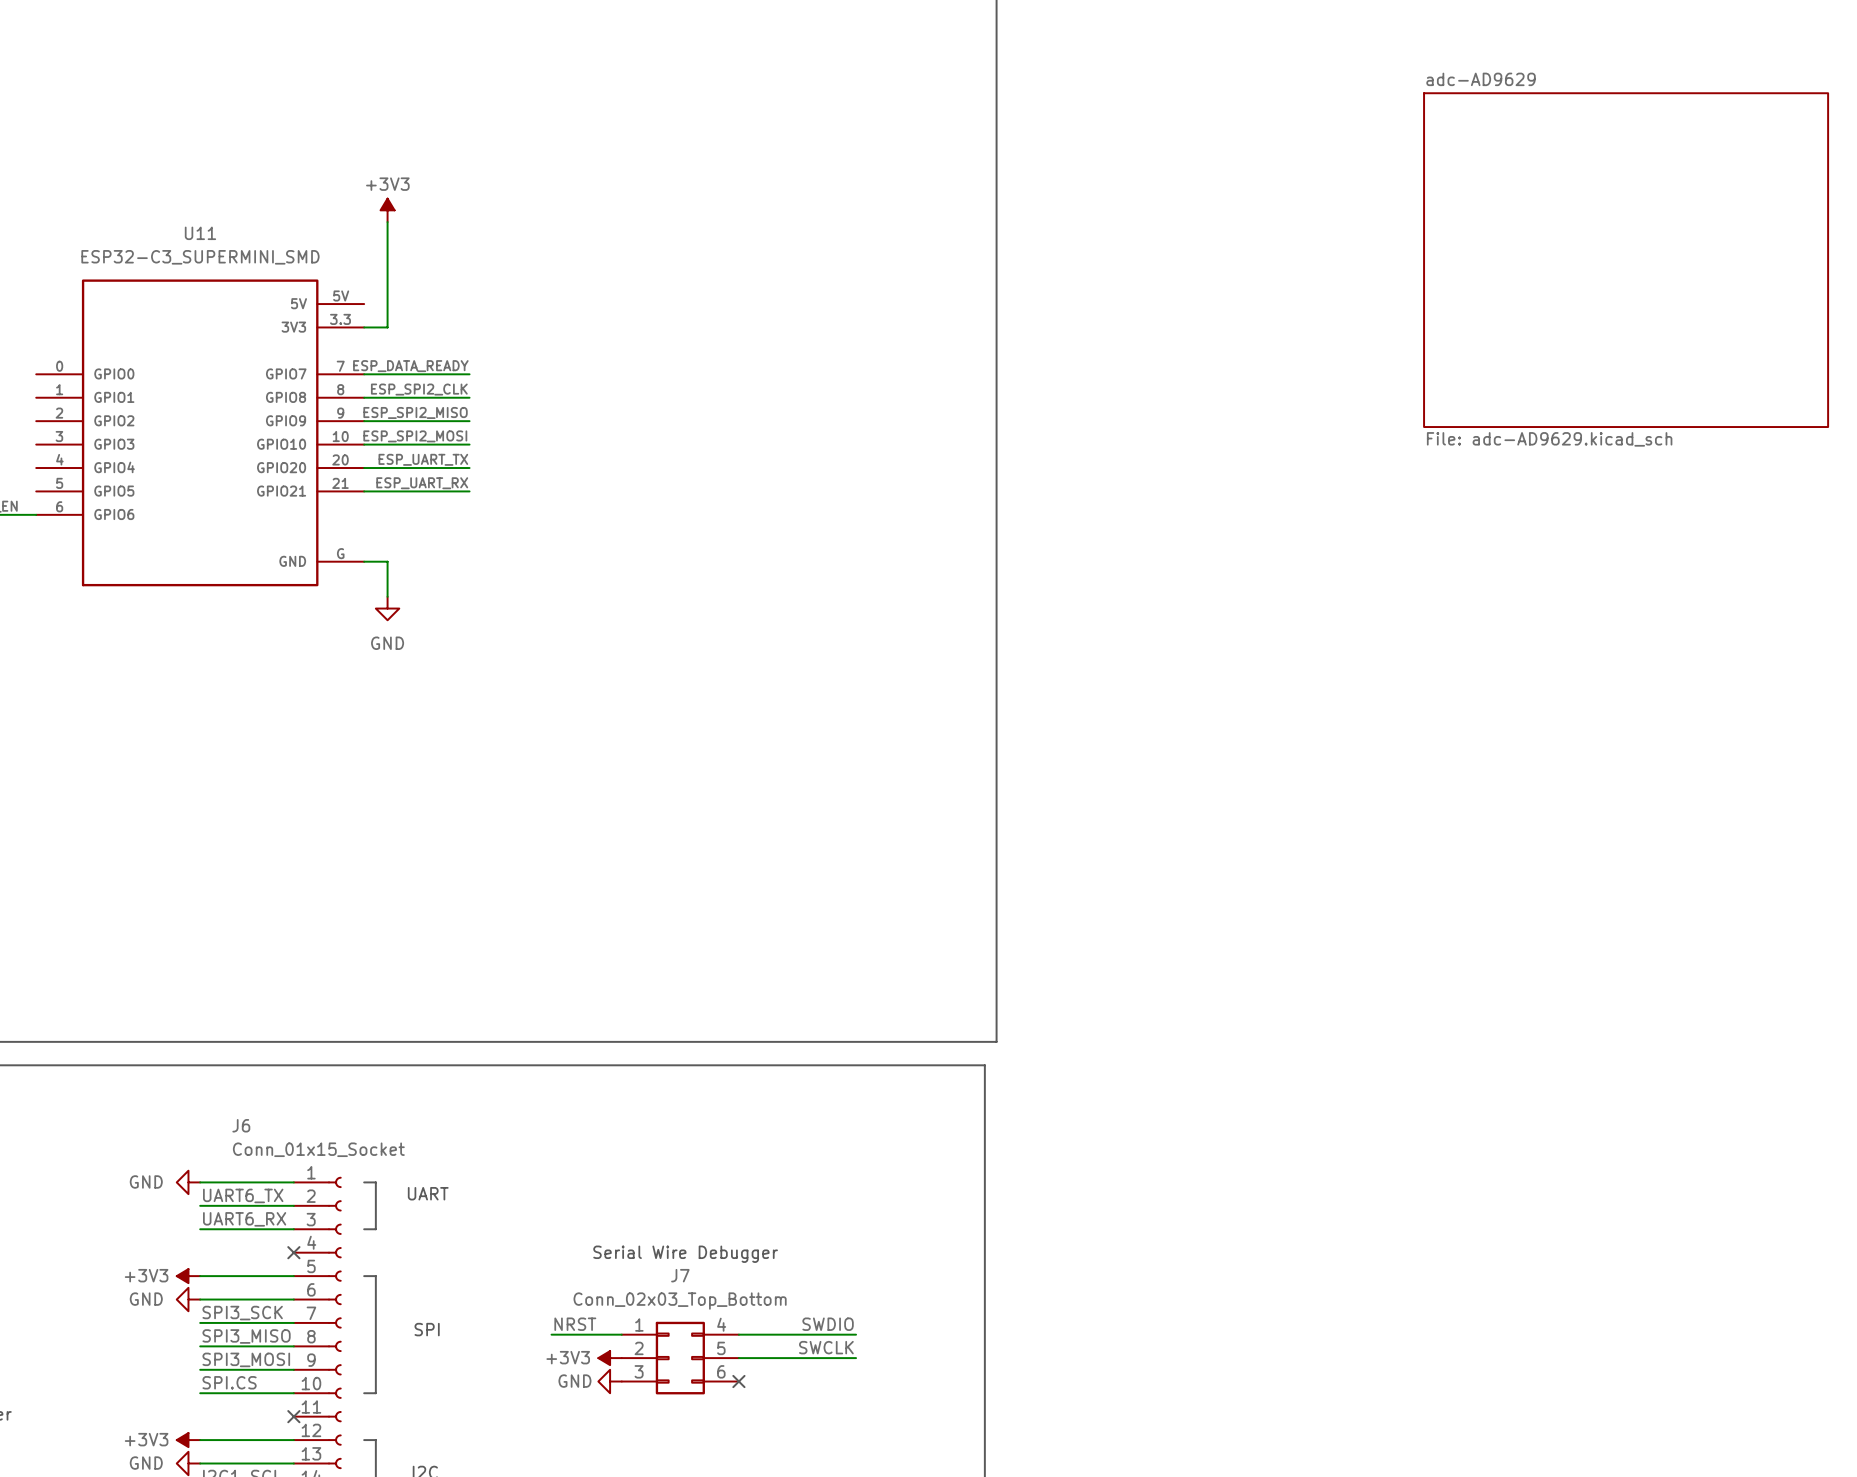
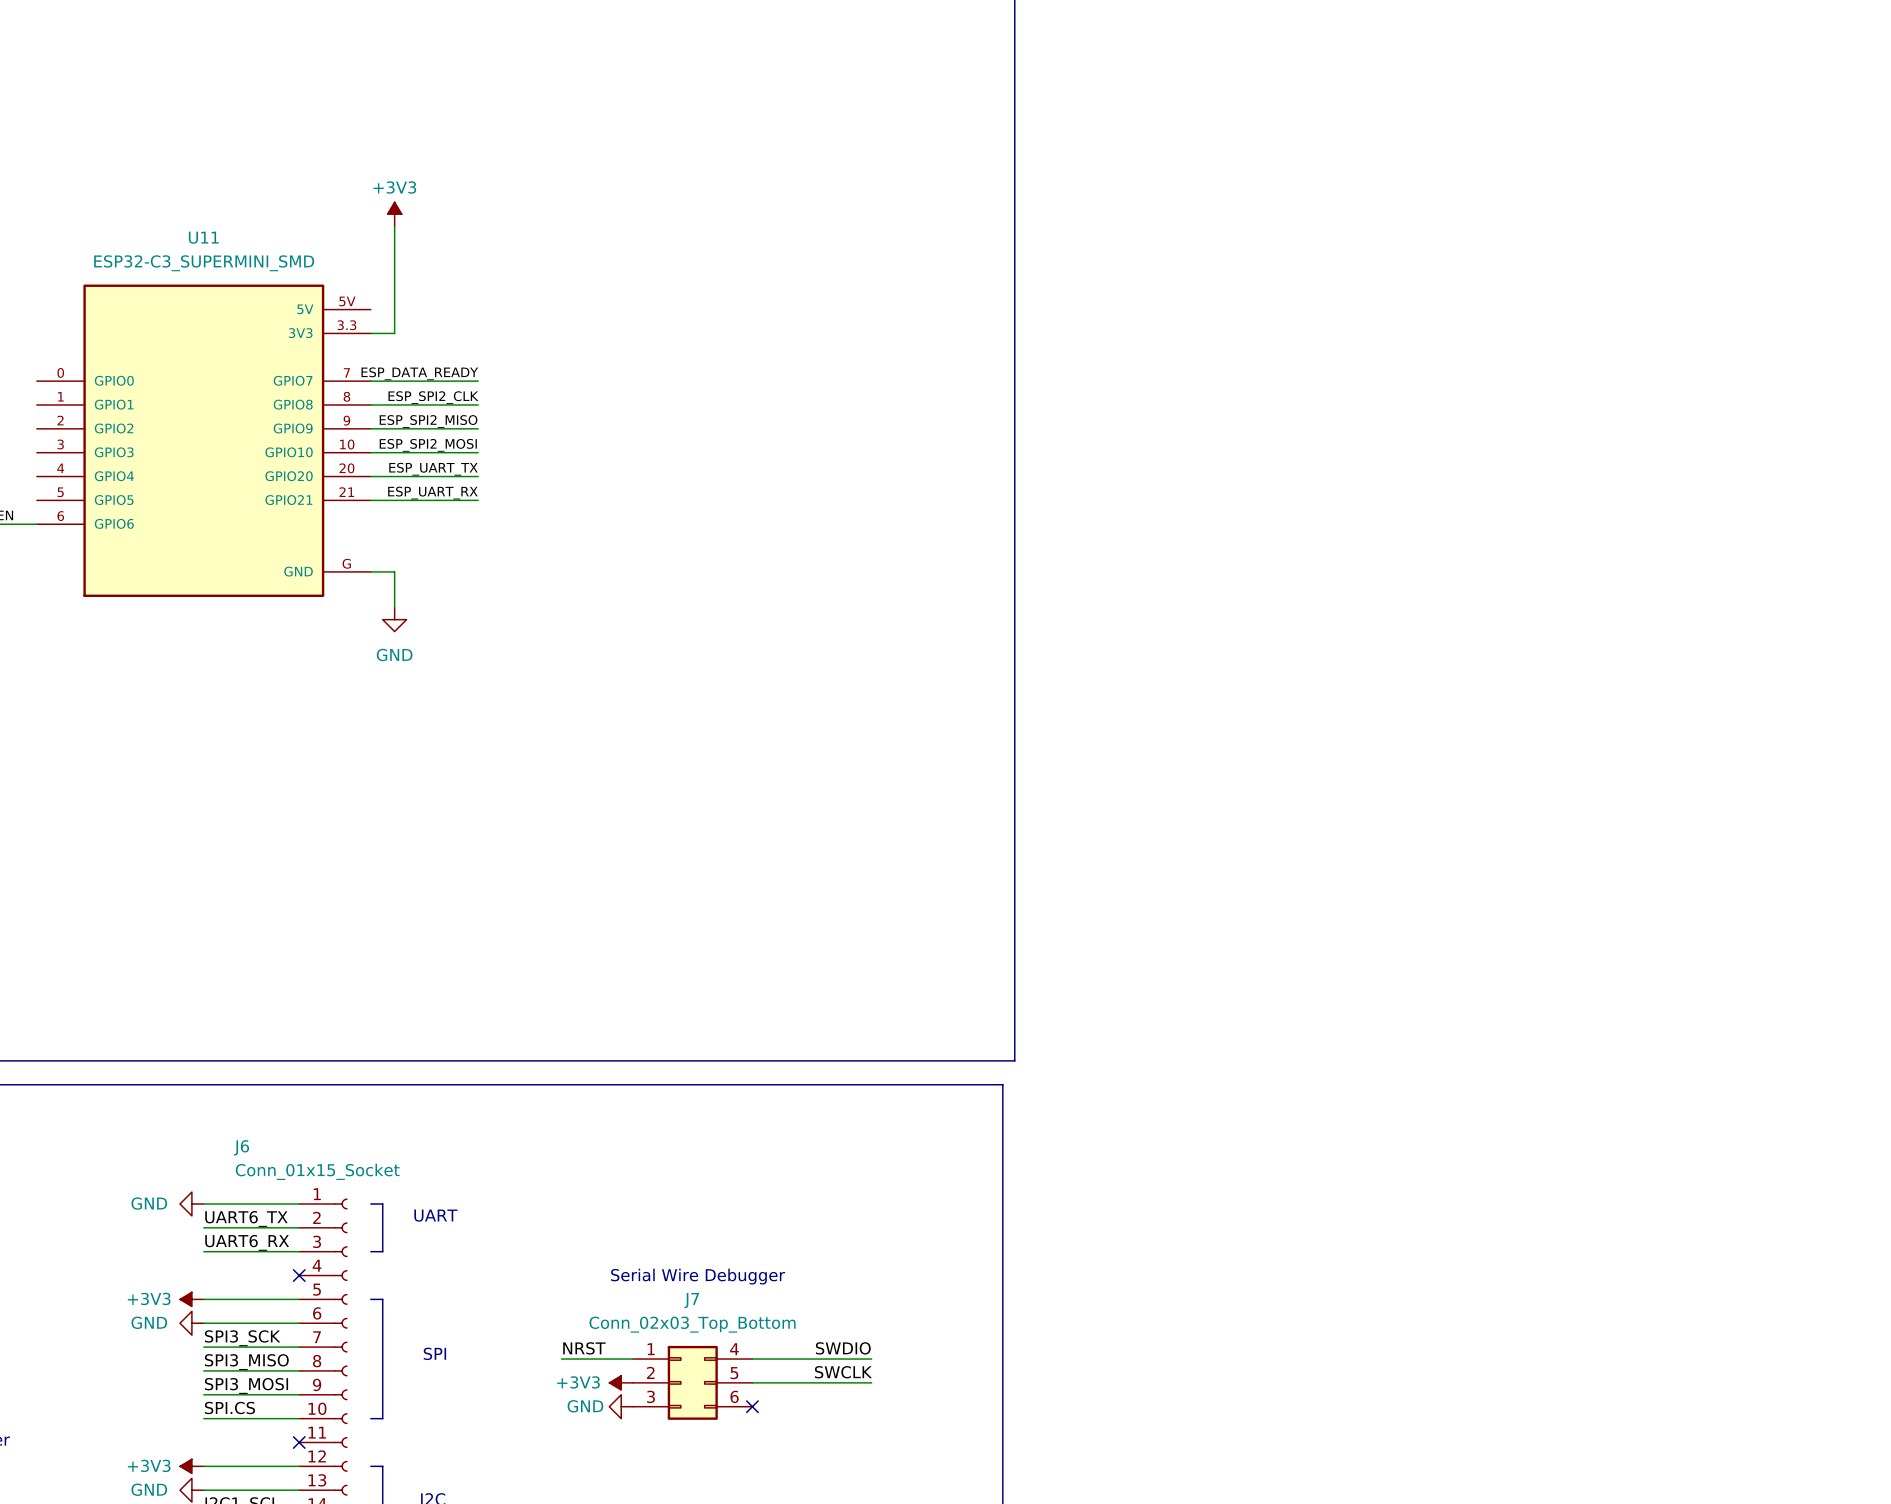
sheet adc-AD9629: File: adc-AD9629.kicad_sch (1626, 260) -> none

